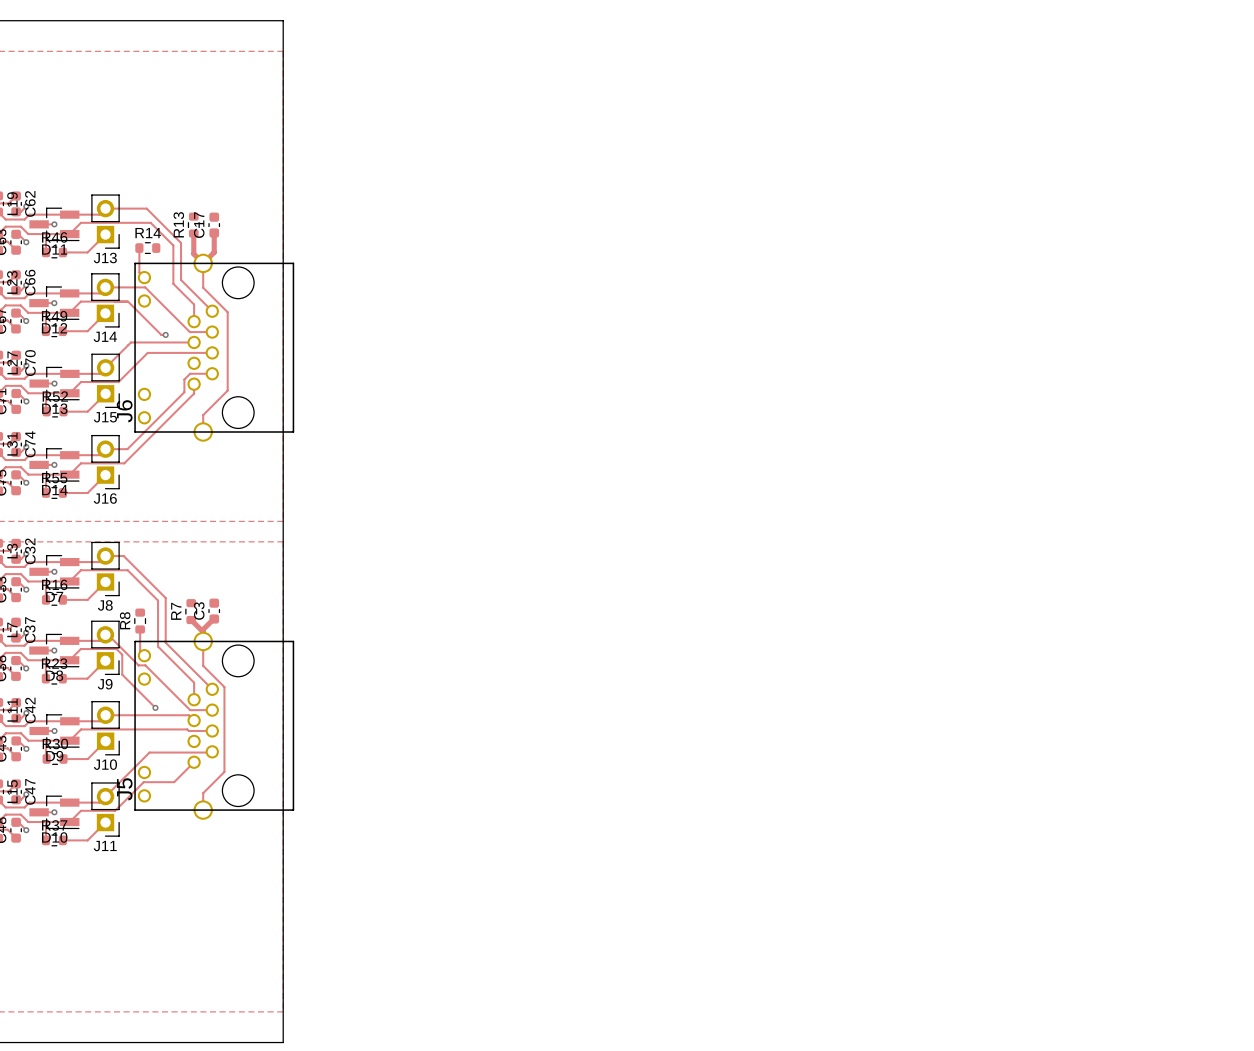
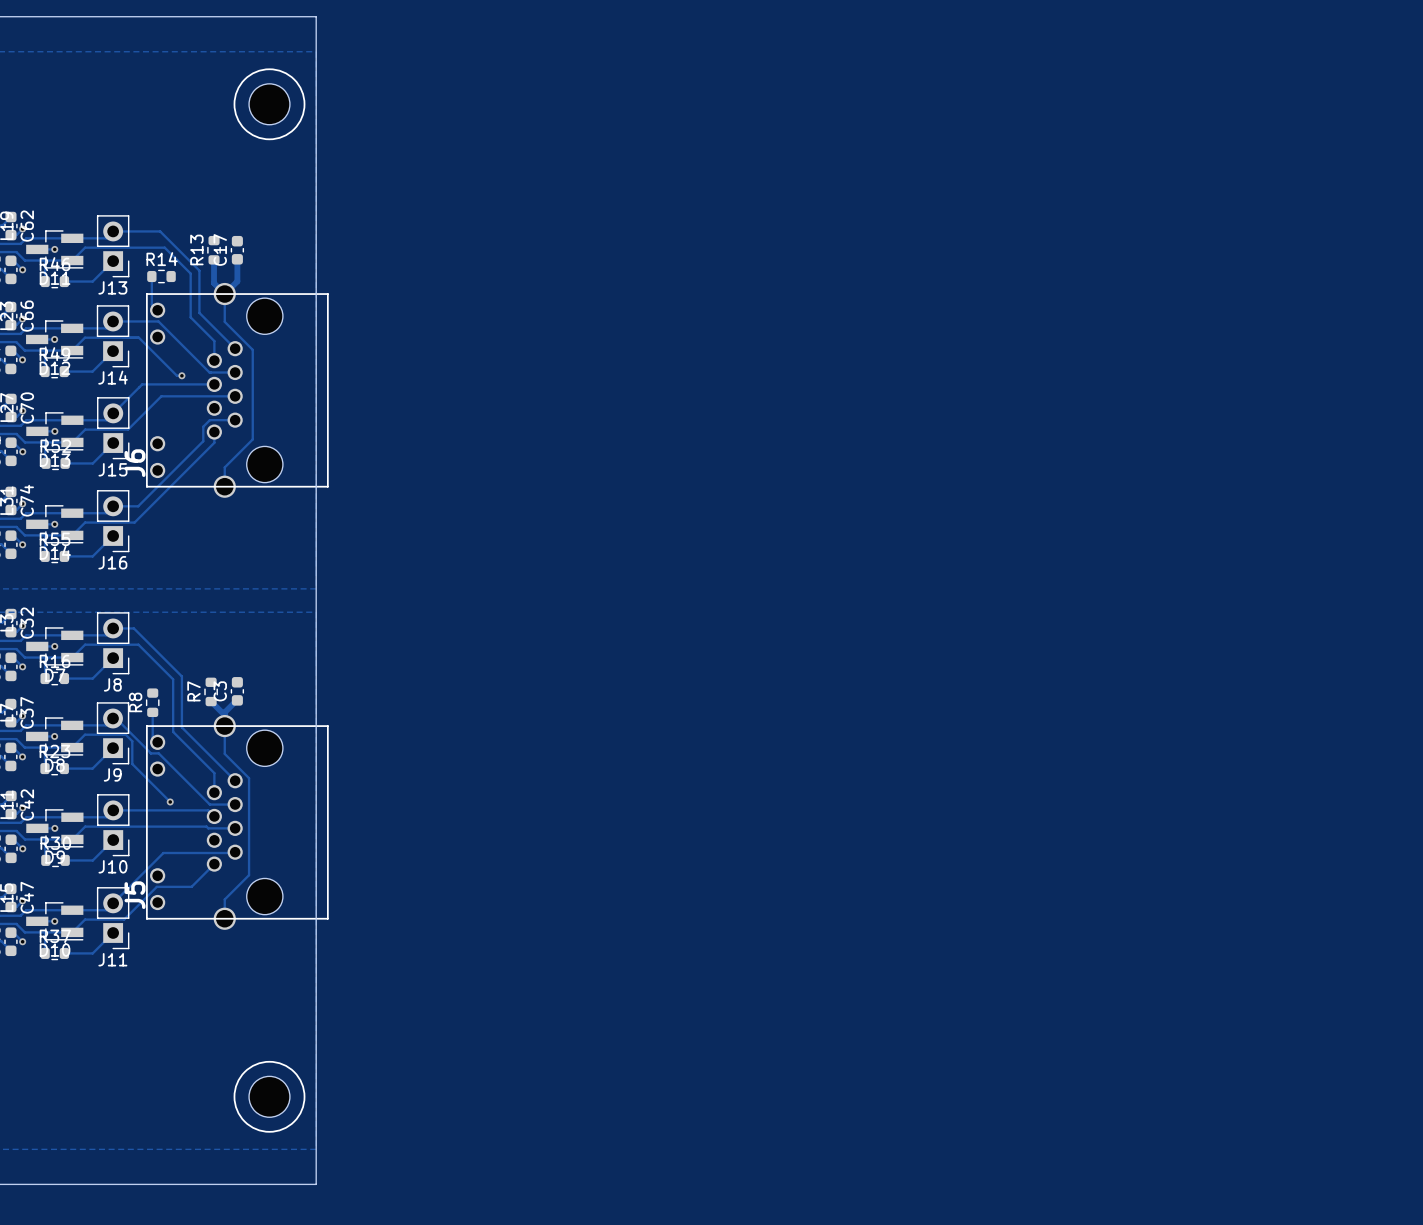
part: none -> (269, 104)
part: none -> (269, 1096)

